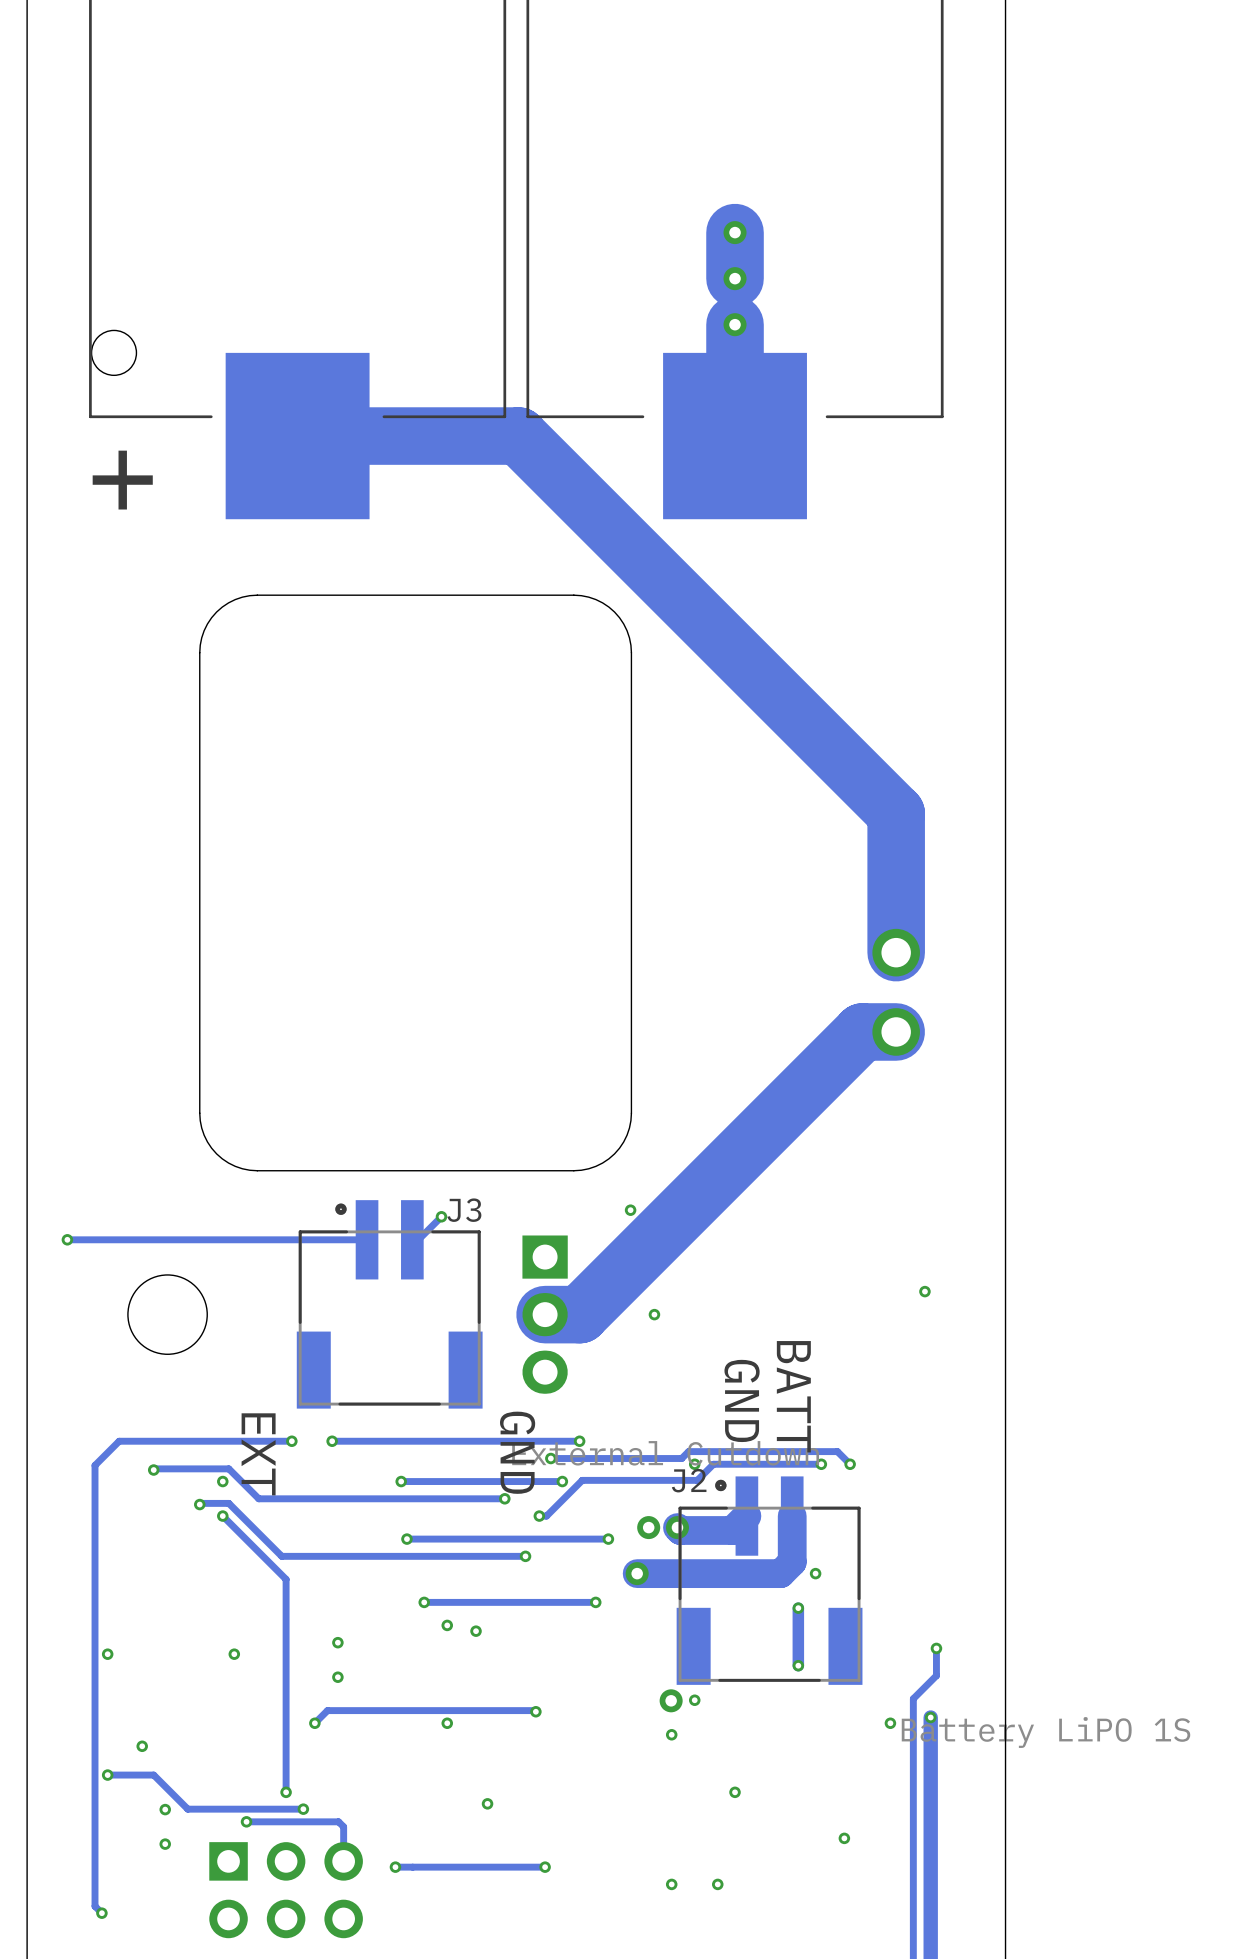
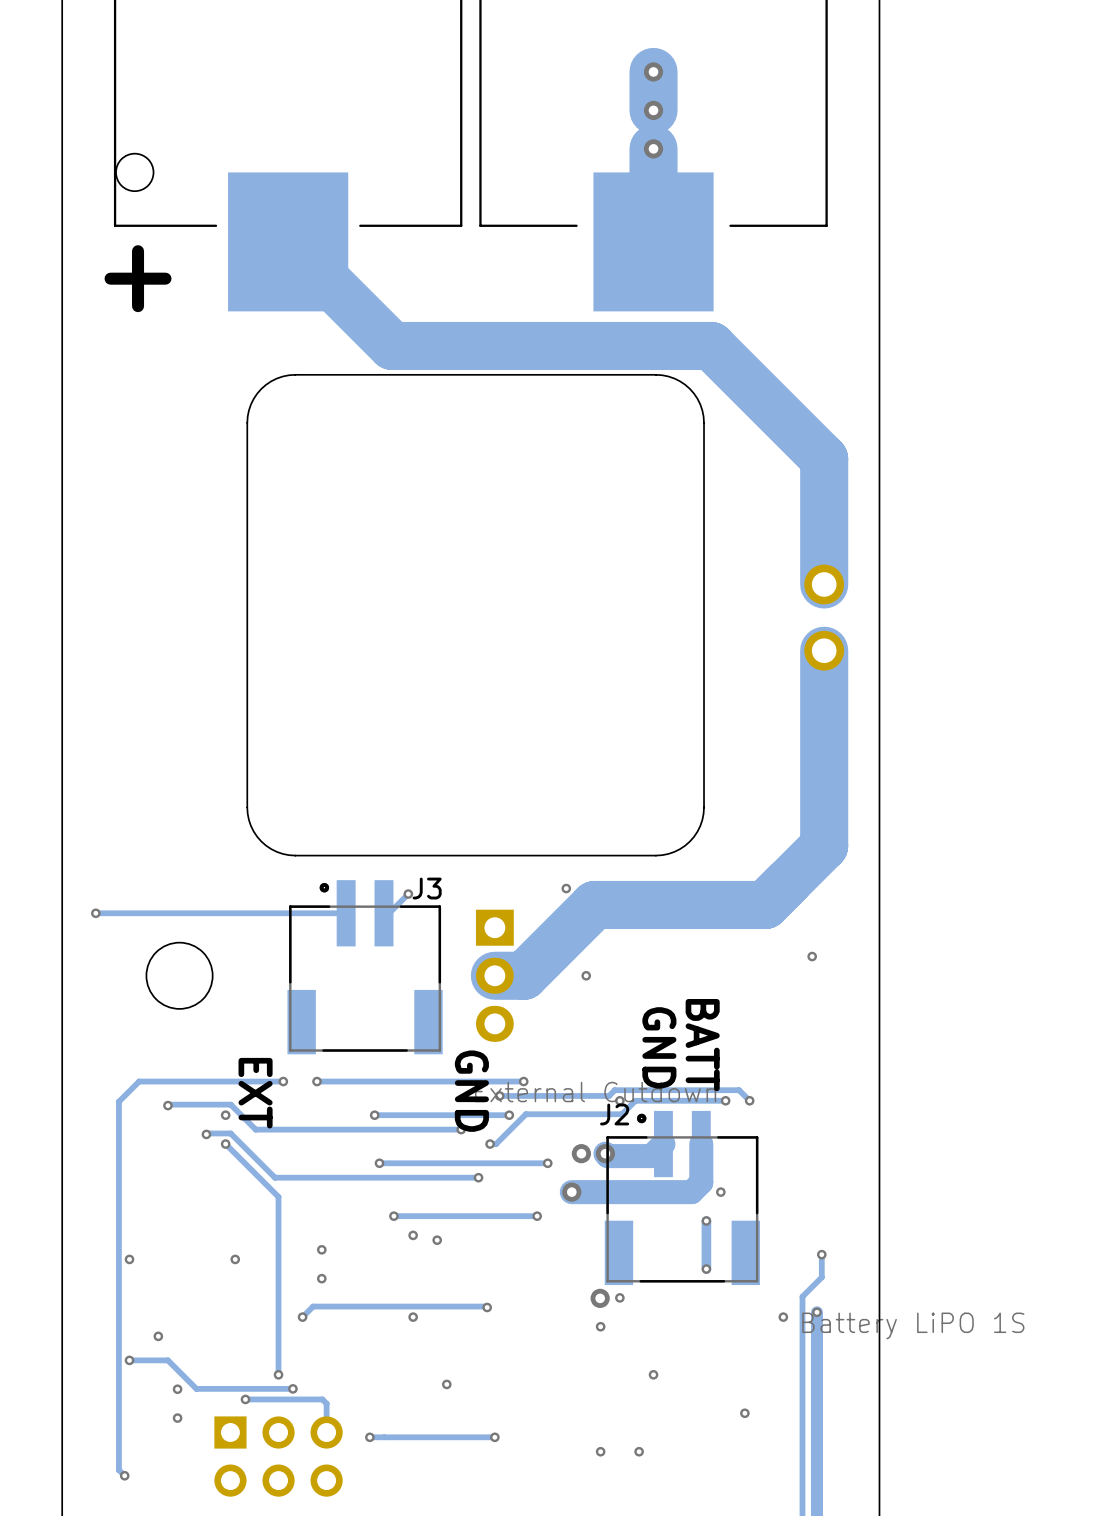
track: (297, 436) (518, 436) (896, 813) (896, 952) -> (288, 241) (392, 345) (711, 345) (824, 458) (824, 584)
board edge: (306, 595) (249, 595) (228, 602) (216, 612) (207, 623) (201, 637) (199, 652) (199, 1113) (201, 1128) (211, 1148) (222, 1158) (235, 1166) (257, 1170) (306, 1170) -> (295, 374) (276, 378) (261, 388) (250, 404) (247, 422) (247, 813) (253, 831) (261, 841) (276, 851) (295, 855)
board edge: (573, 595) (595, 599) (614, 612) (627, 630) (630, 645) (631, 1113) (627, 1135) (614, 1153) (595, 1166) (573, 1170) -> (518, 374) (655, 374) (668, 376) (685, 384) (694, 393) (700, 404) (704, 422) (704, 807) (700, 825) (694, 836) (685, 845) (674, 851) (662, 855) (518, 855)
part position: (896, 992) -> (824, 617)
track: (896, 1031) (862, 1031) (664, 1229) -> (824, 650) (824, 845) (765, 904) (594, 904)

